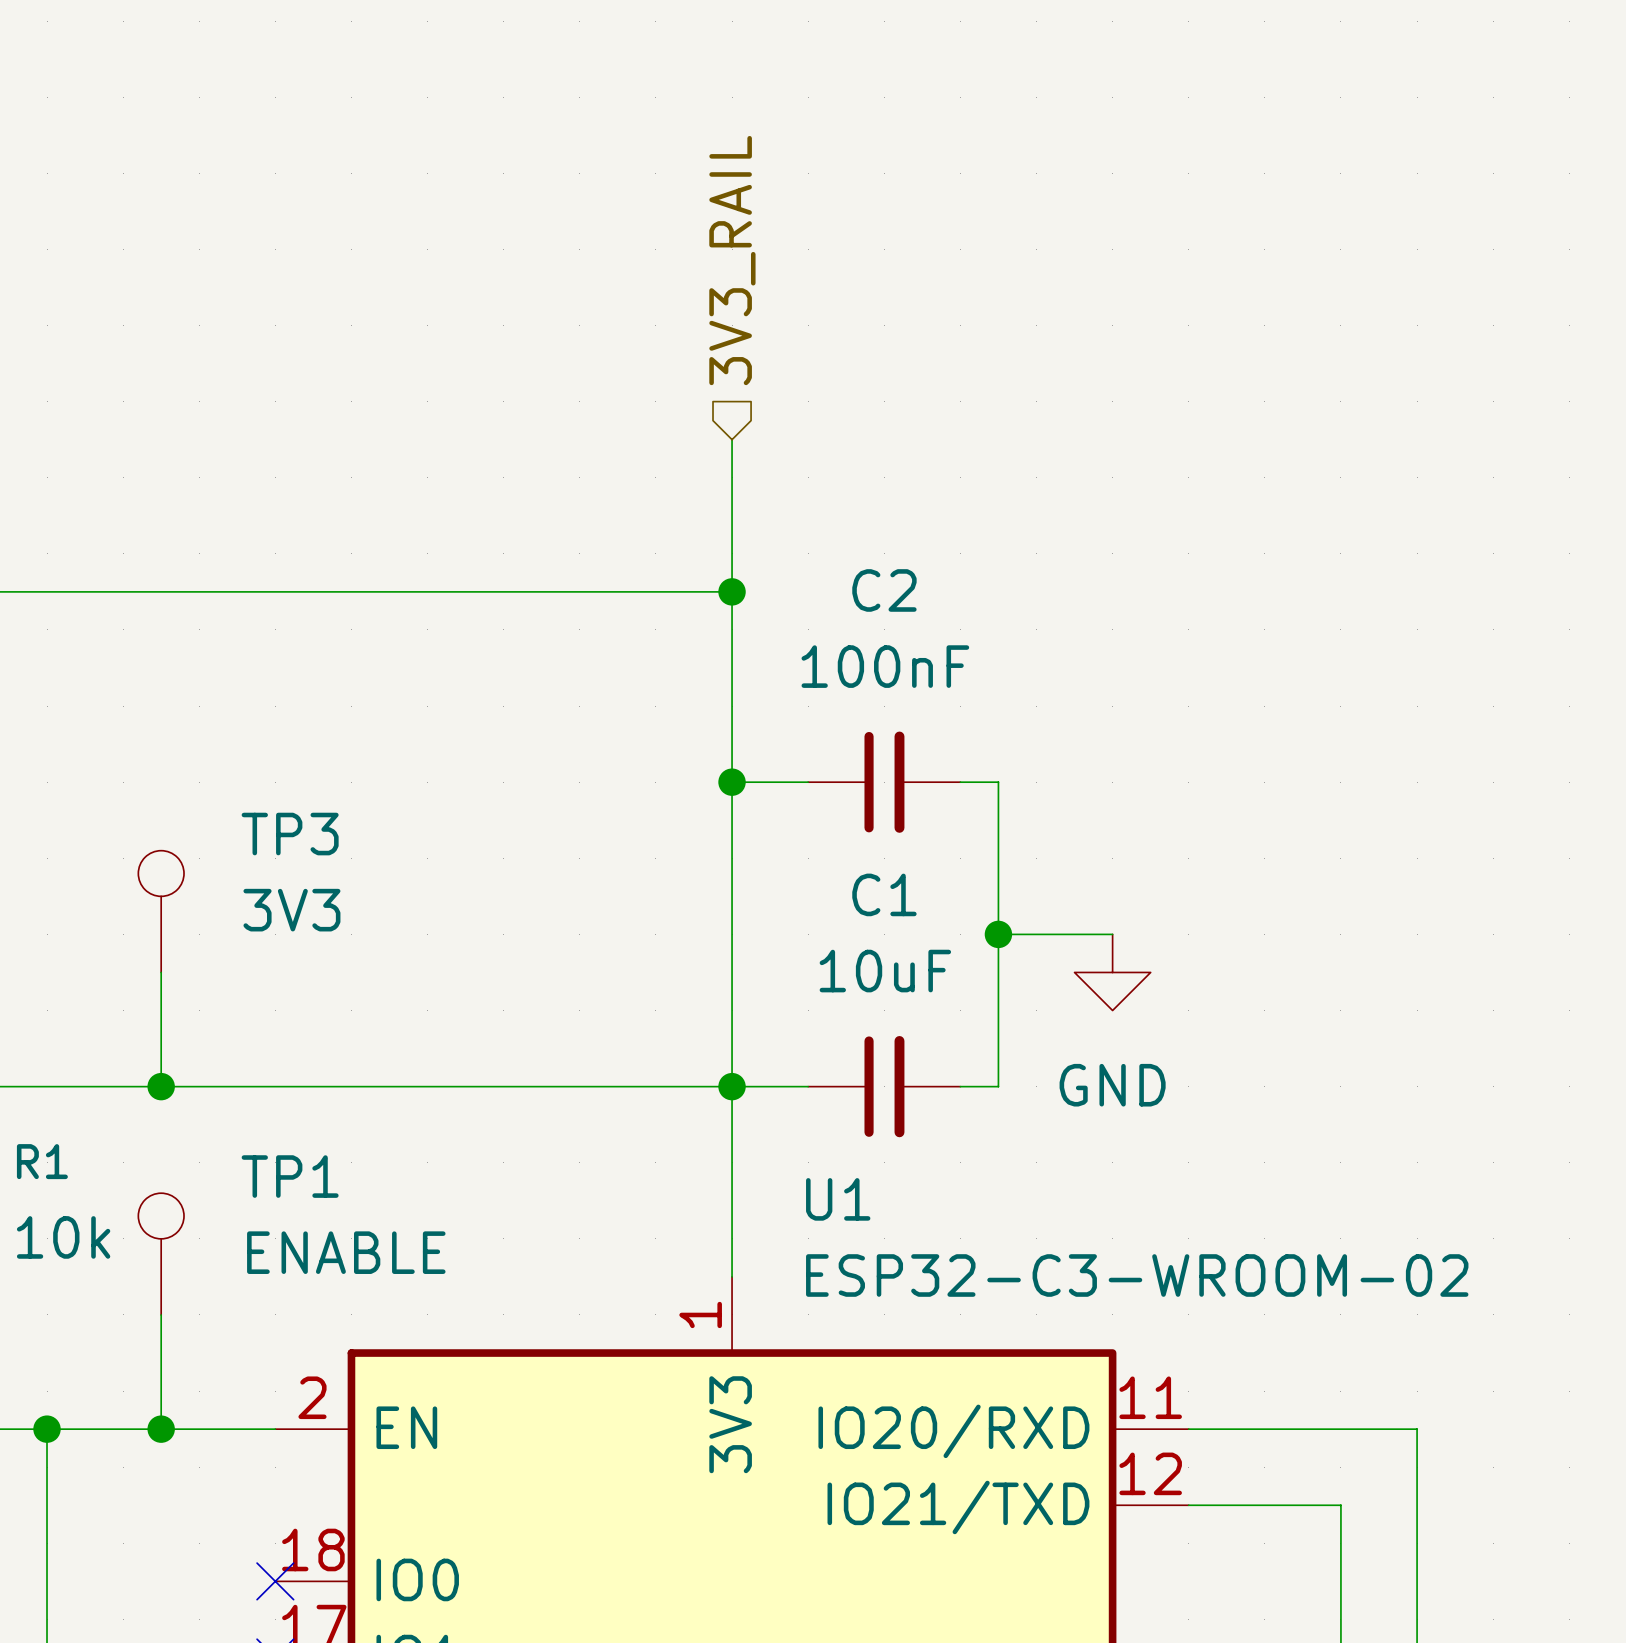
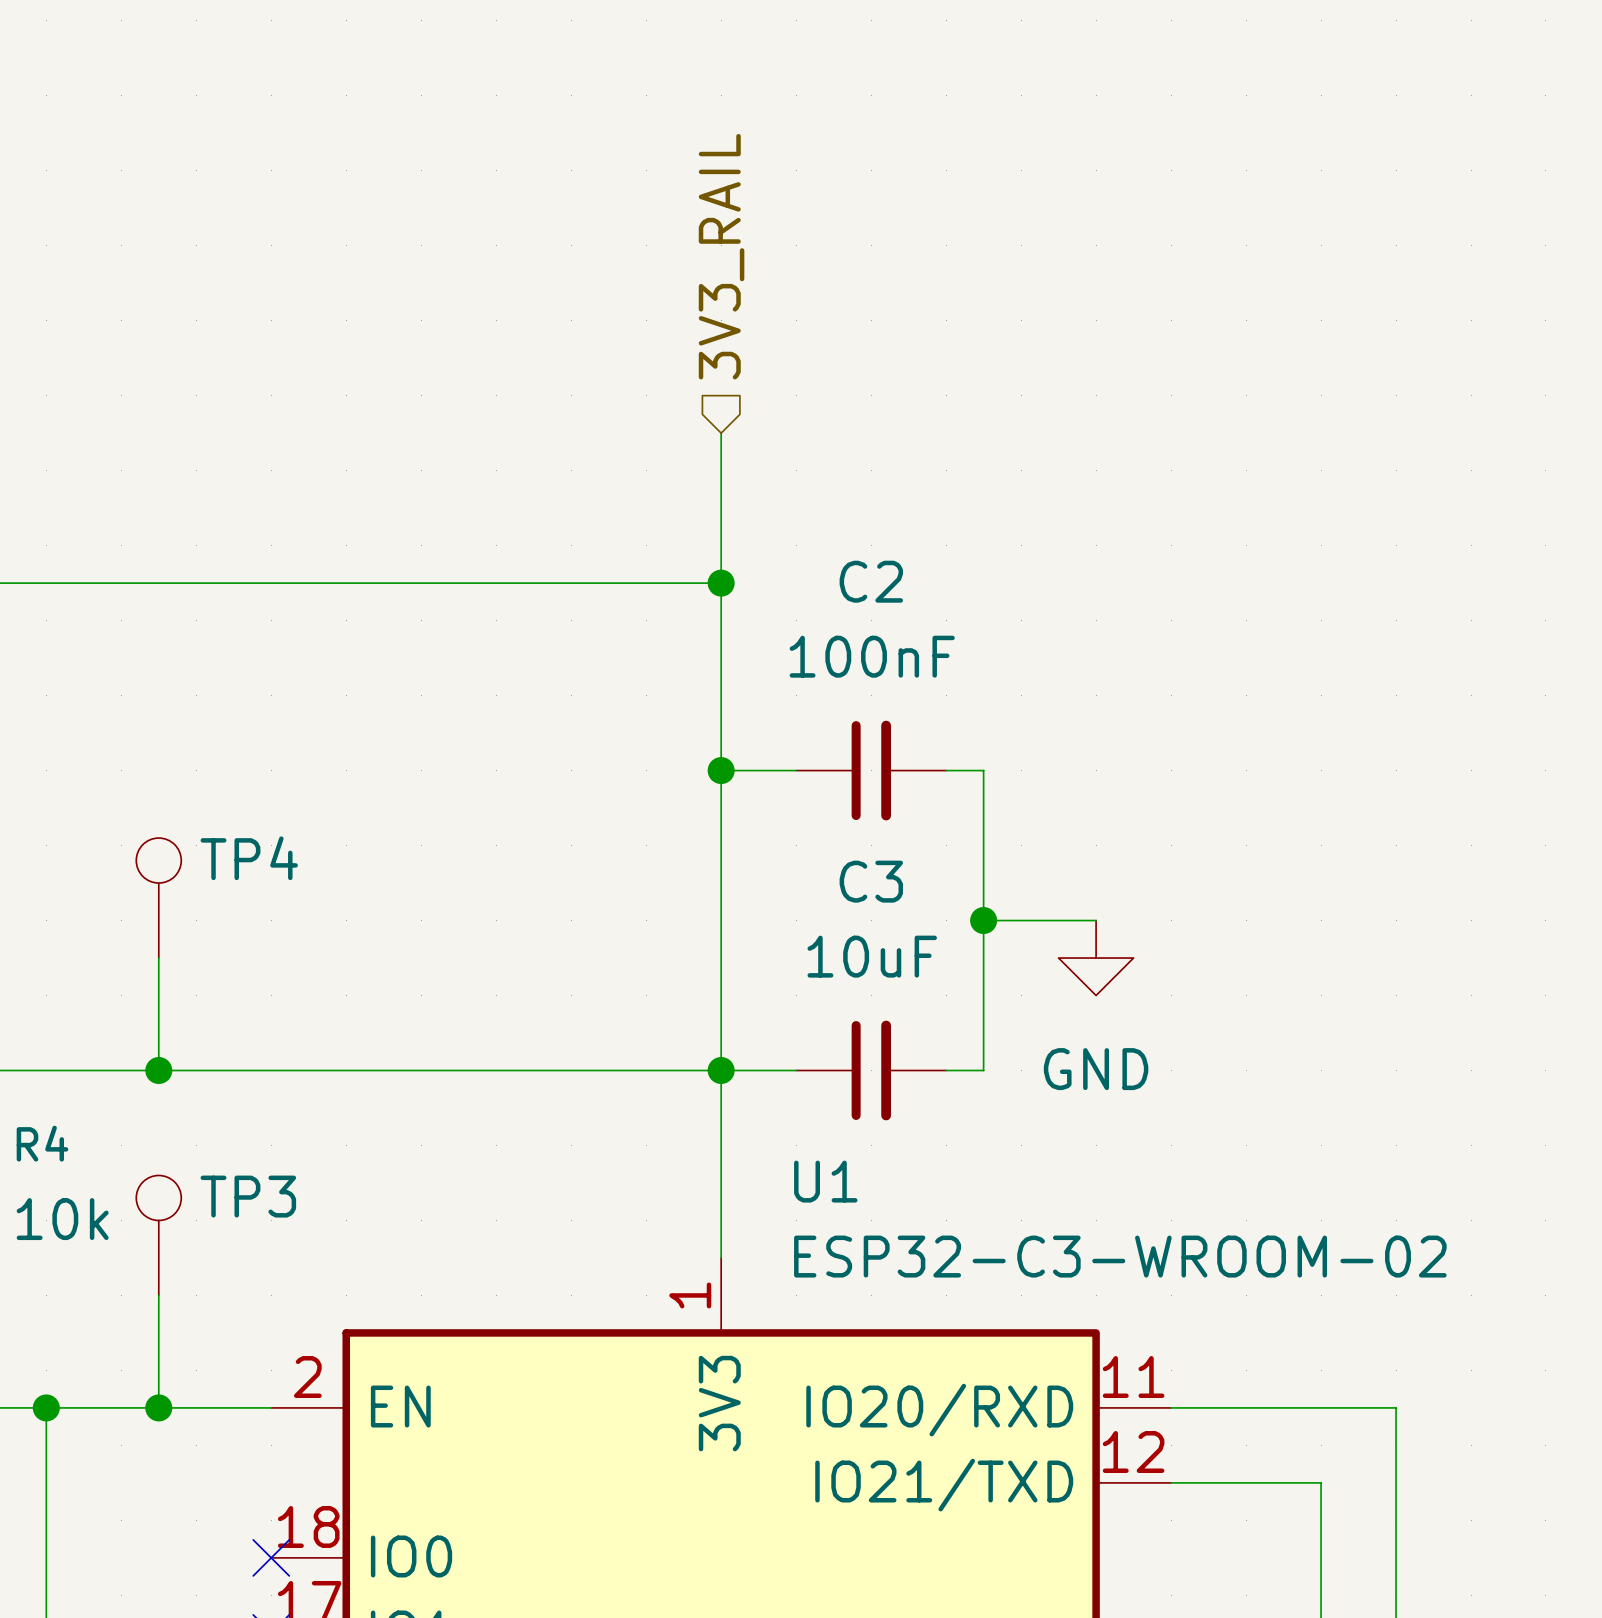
TP3 name: TP3 (290, 834) -> TP4 (249, 858)
C1 name: C1 (884, 894) -> C3 (871, 881)
TP3 value: 3V3 (291, 910) -> none
R1 name: R1 (42, 1161) -> R4 (42, 1143)
TP1 name: TP1 (290, 1176) -> TP3 (248, 1196)
TP1 value: ENABLE (346, 1252) -> none

